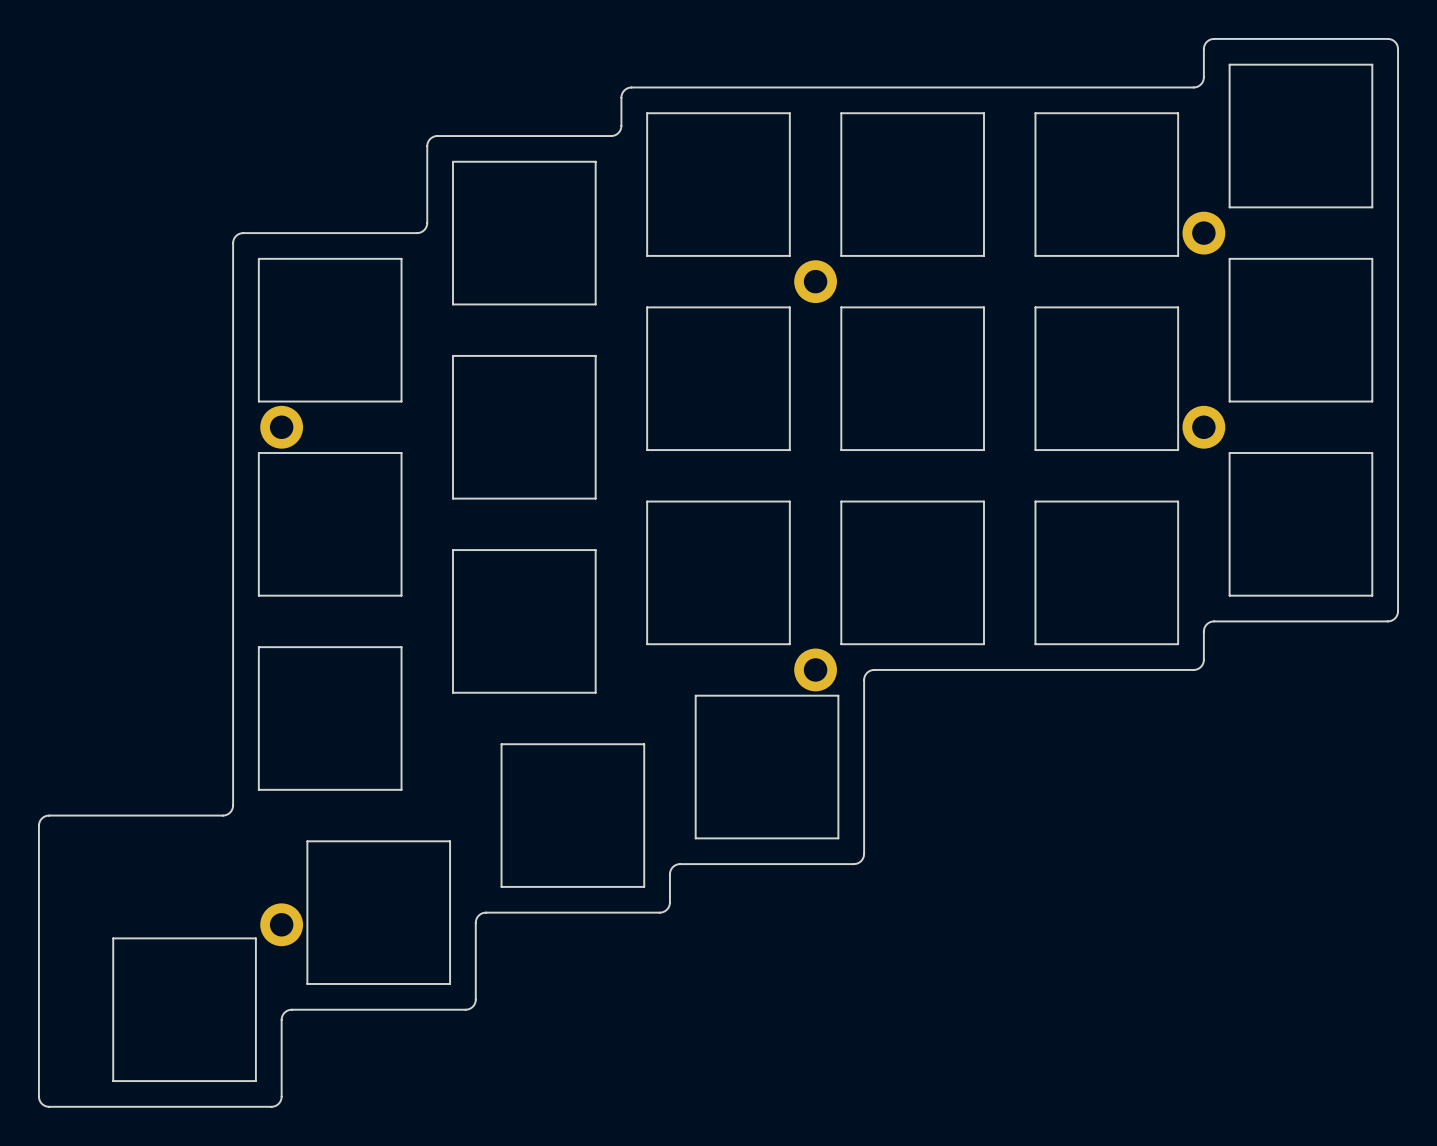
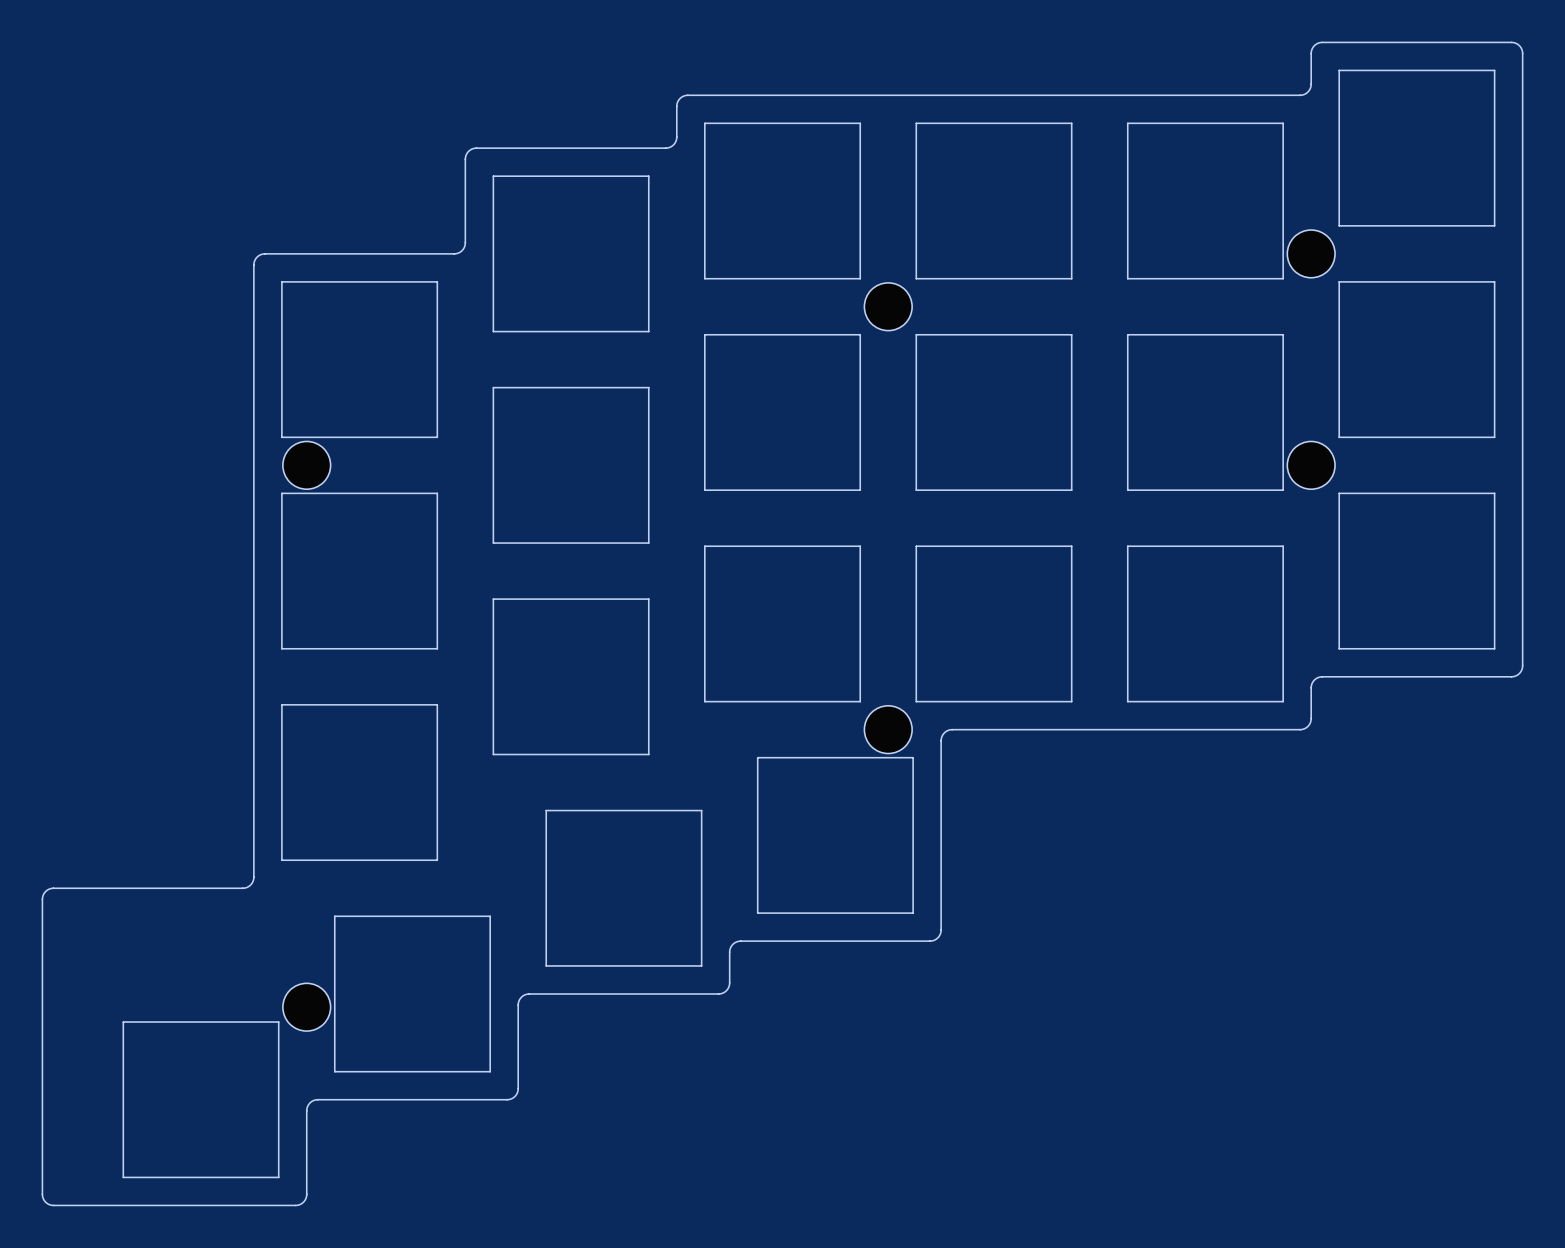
part footprint: [1182, 211, 1226, 255] -> [1287, 230, 1336, 278]
part footprint: [794, 260, 837, 304] -> [864, 282, 913, 331]
part footprint: [260, 405, 304, 449] -> [282, 441, 331, 490]
part footprint: [1182, 405, 1226, 449] -> [1287, 441, 1336, 490]
part footprint: [794, 648, 837, 692] -> [864, 705, 913, 754]
part footprint: [260, 903, 304, 947] -> [282, 983, 331, 1032]

